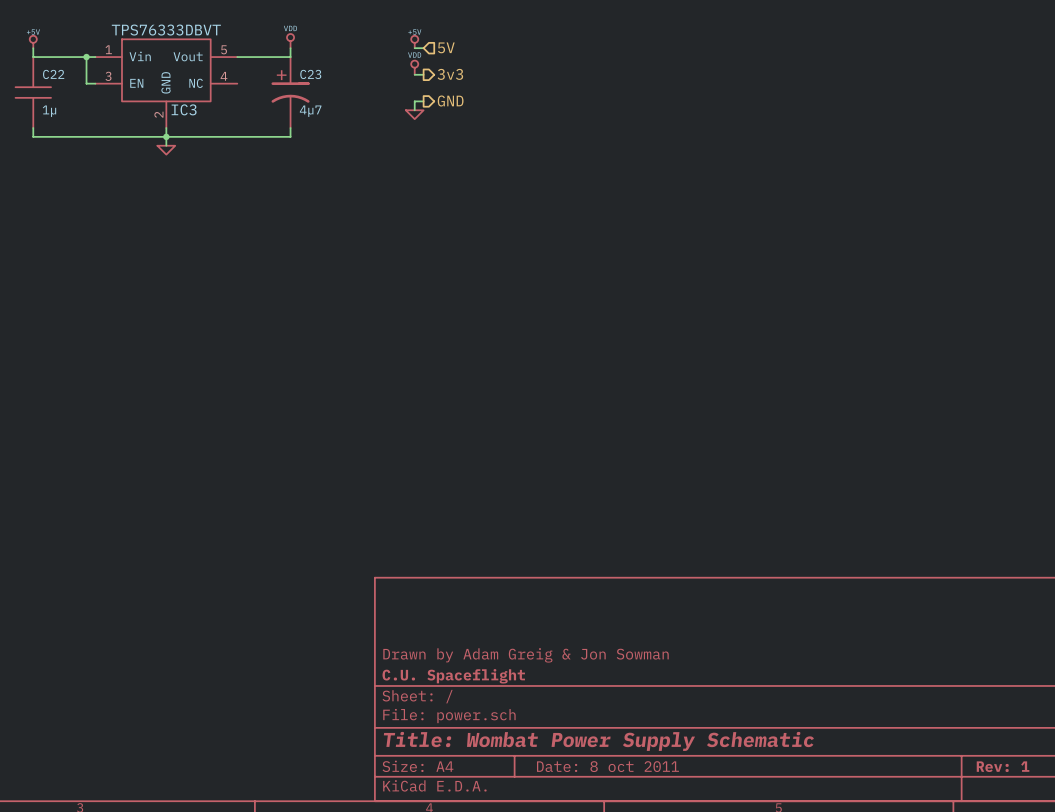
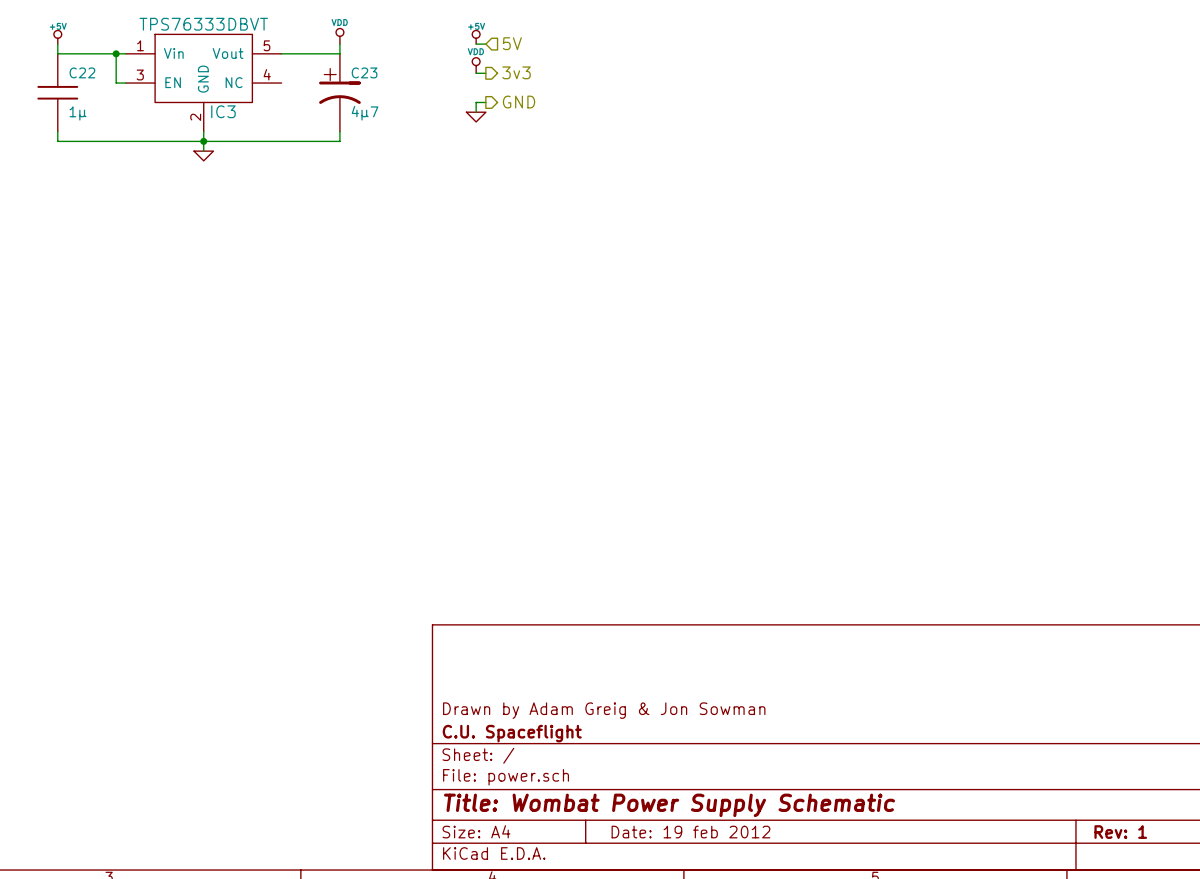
title block: Date: 8 oct 2011 (607, 766) -> Date: 19 feb 2012 (690, 832)

